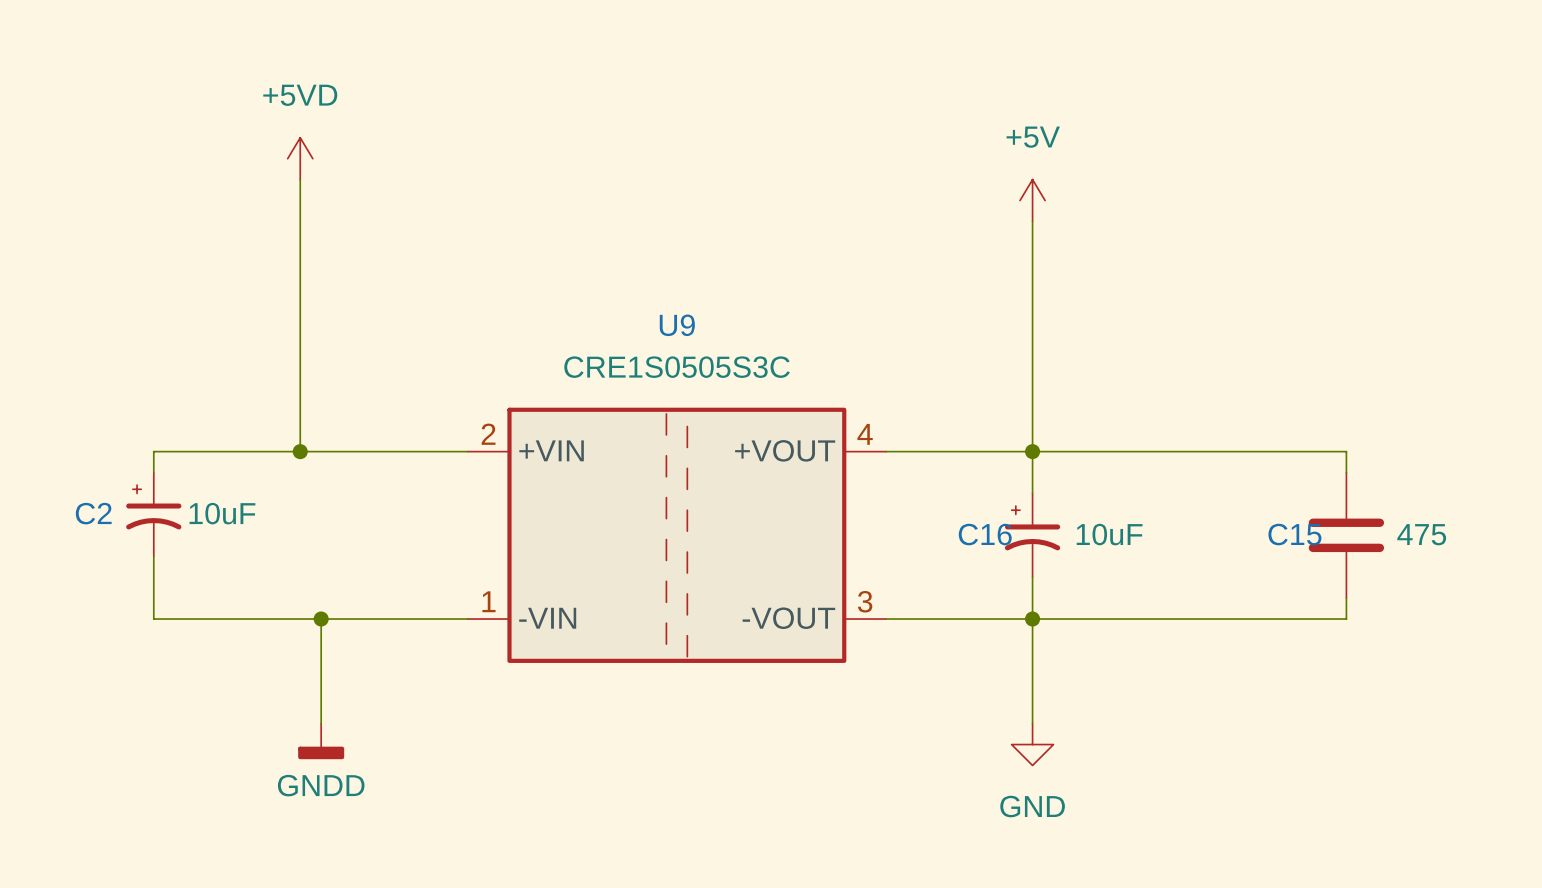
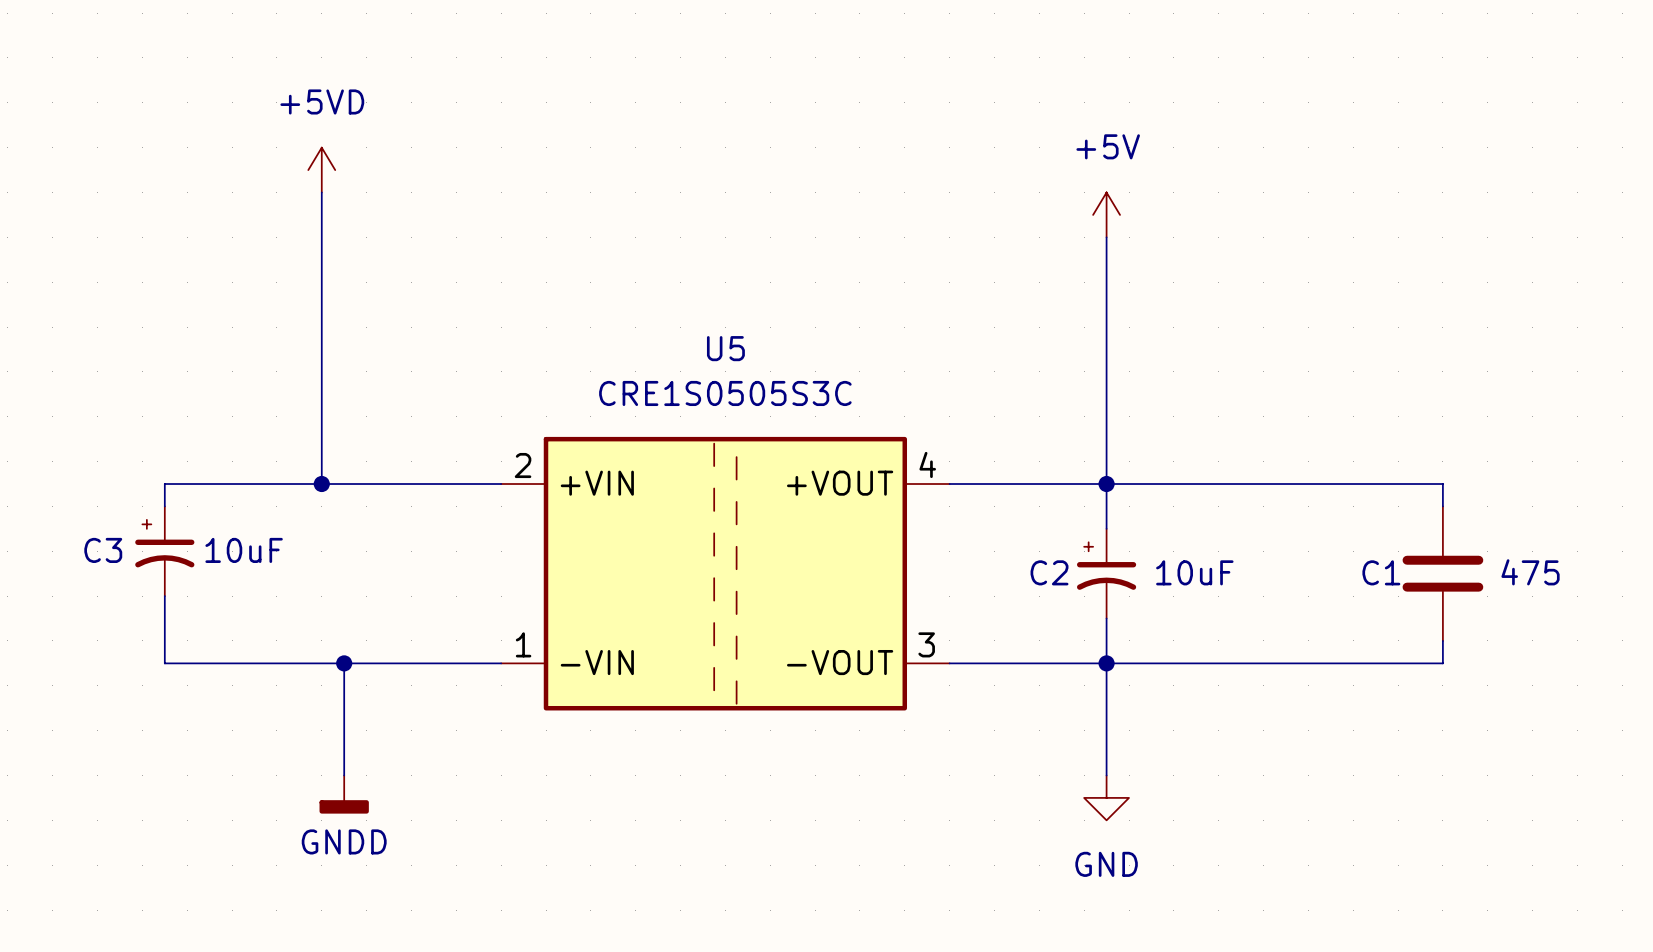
U9 name: U9 (677, 325) -> U5 (725, 348)
C2 name: C2 (93, 513) -> C3 (103, 550)
C16 name: C16 (985, 534) -> C2 (1049, 572)
C15 name: C15 (1294, 534) -> C1 (1381, 572)

